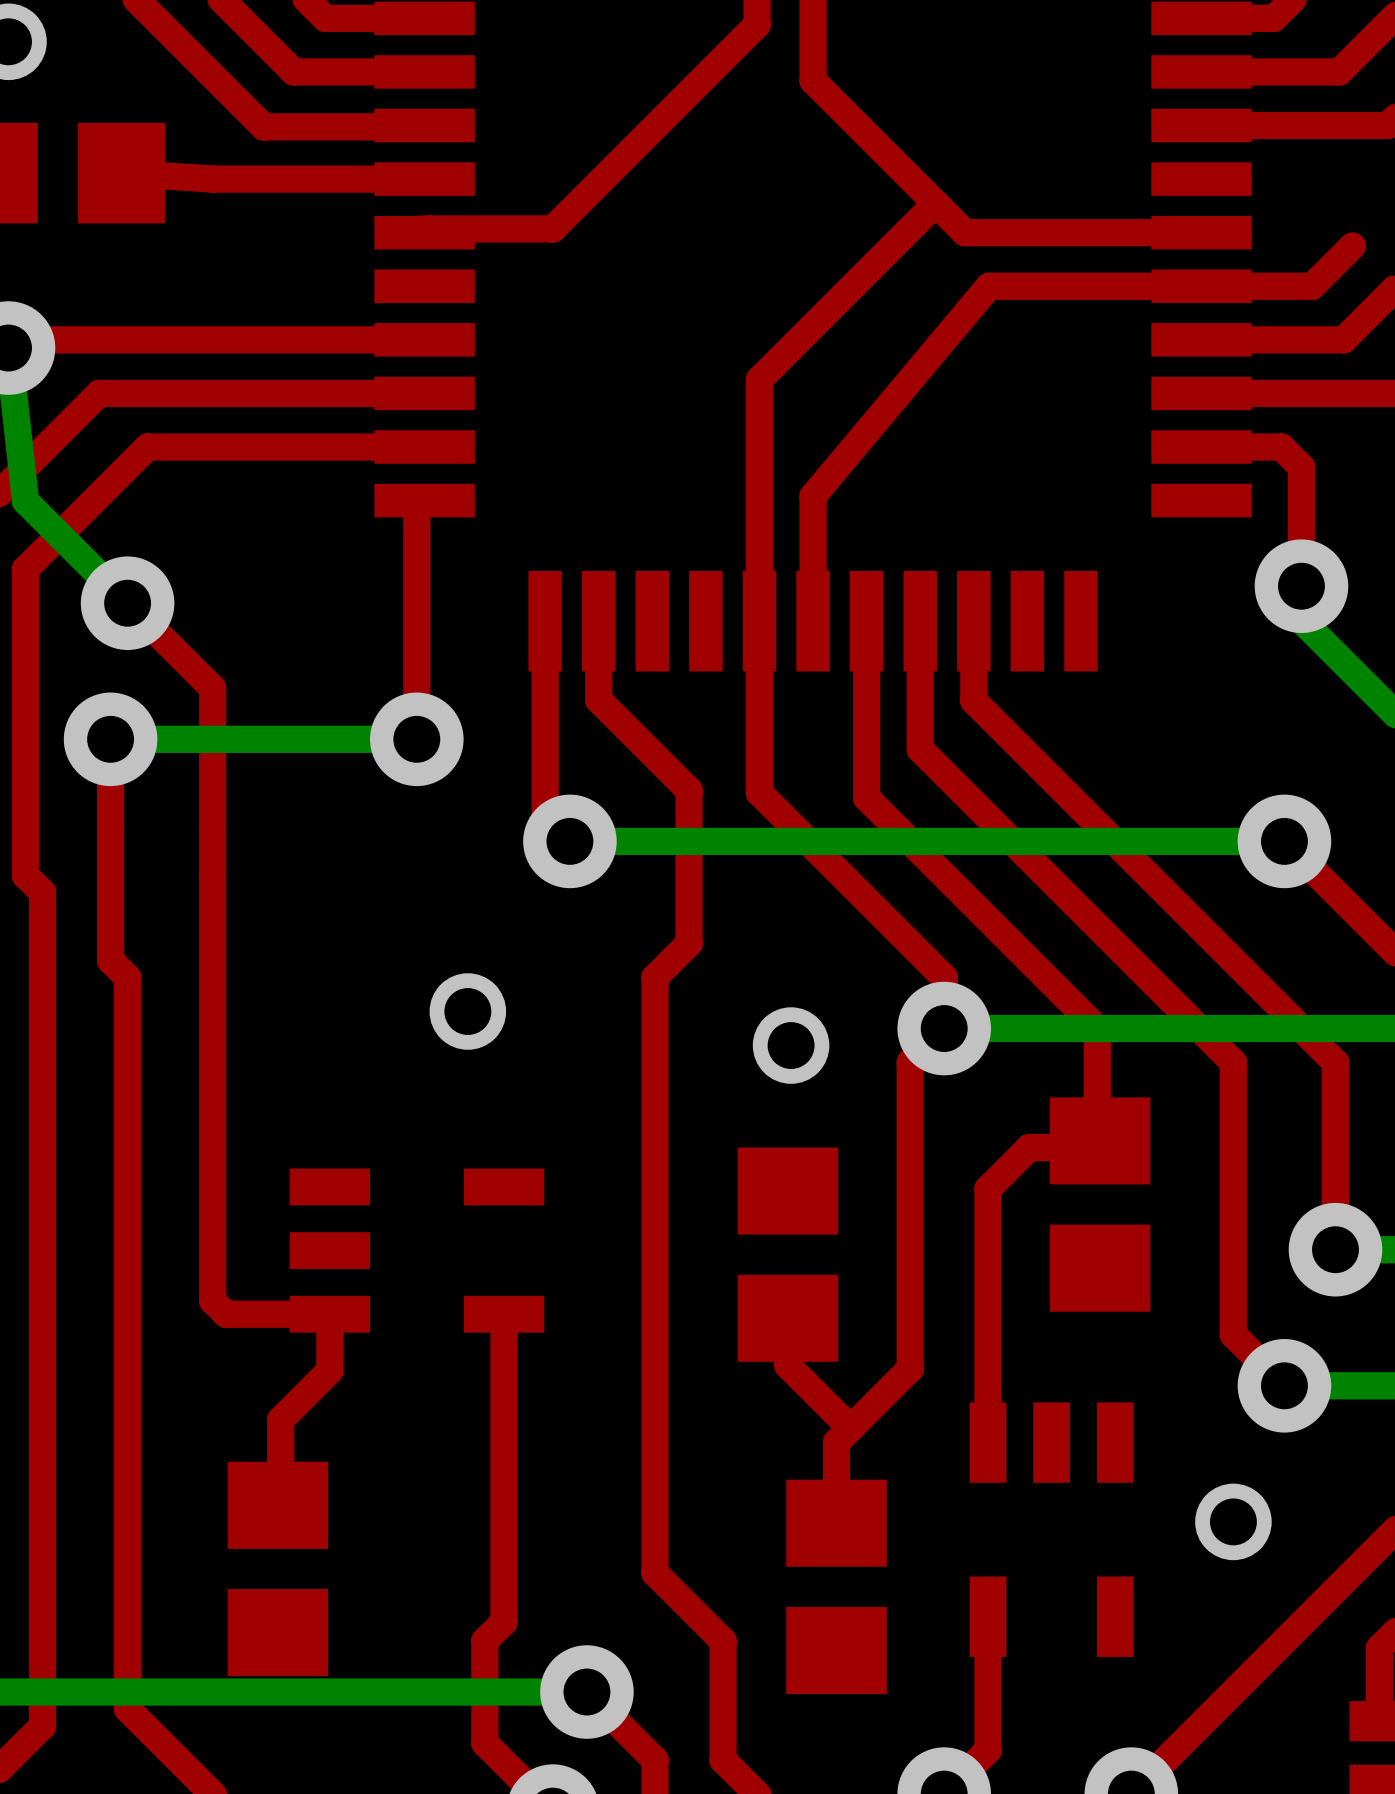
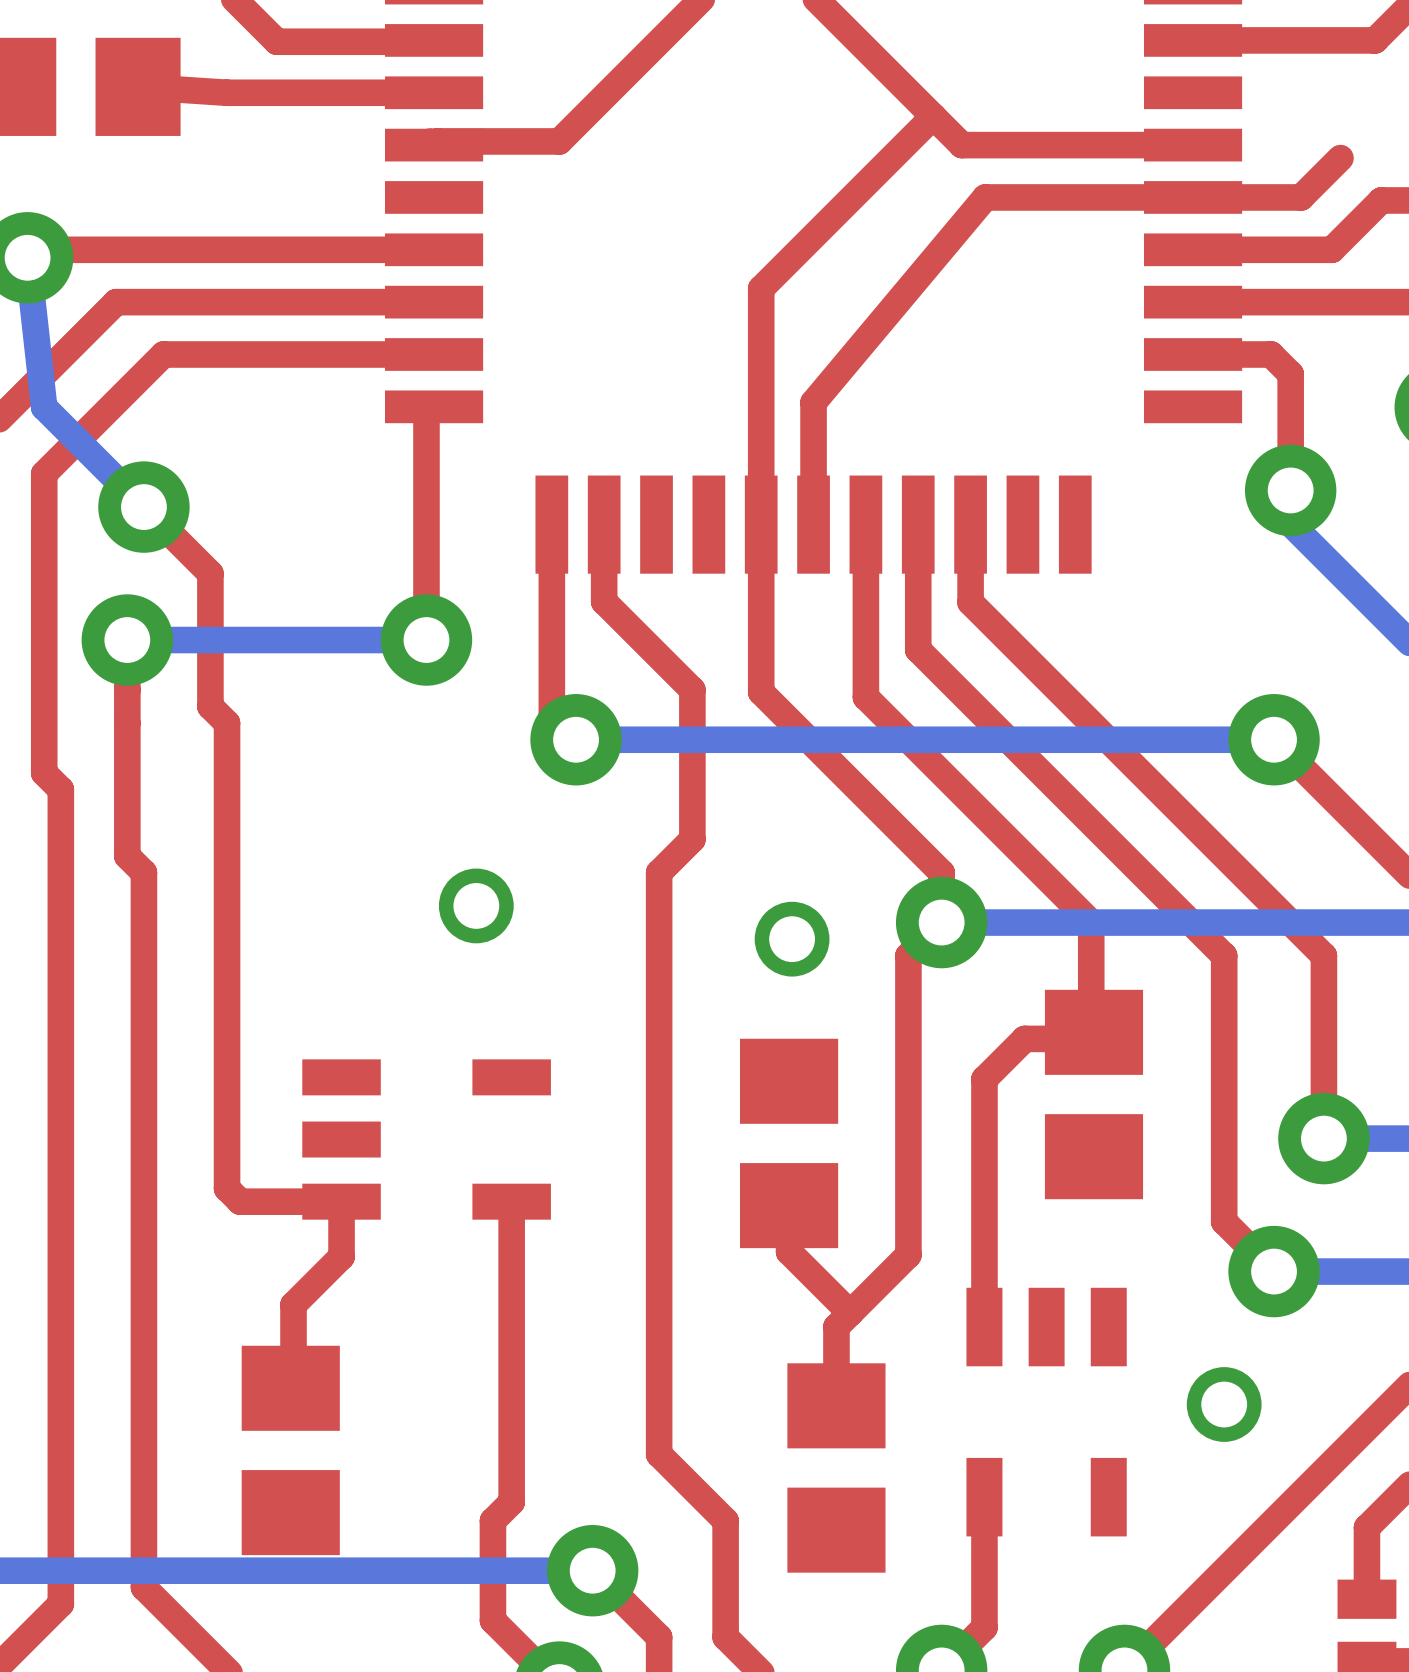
top track: (195, 671) (212, 688) (212, 824) -> (210, 573) (210, 706) (227, 723)

